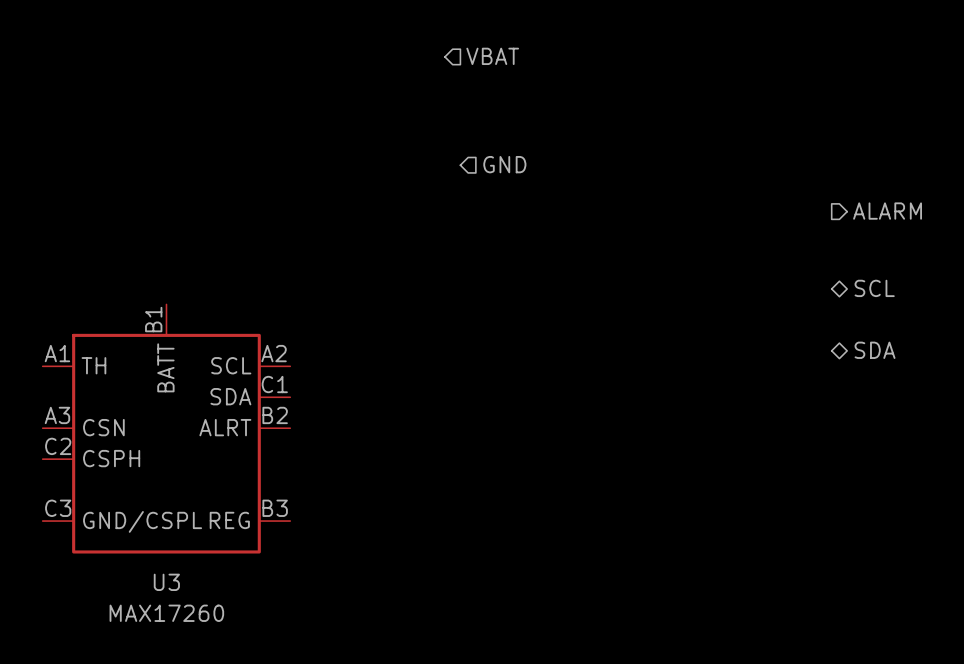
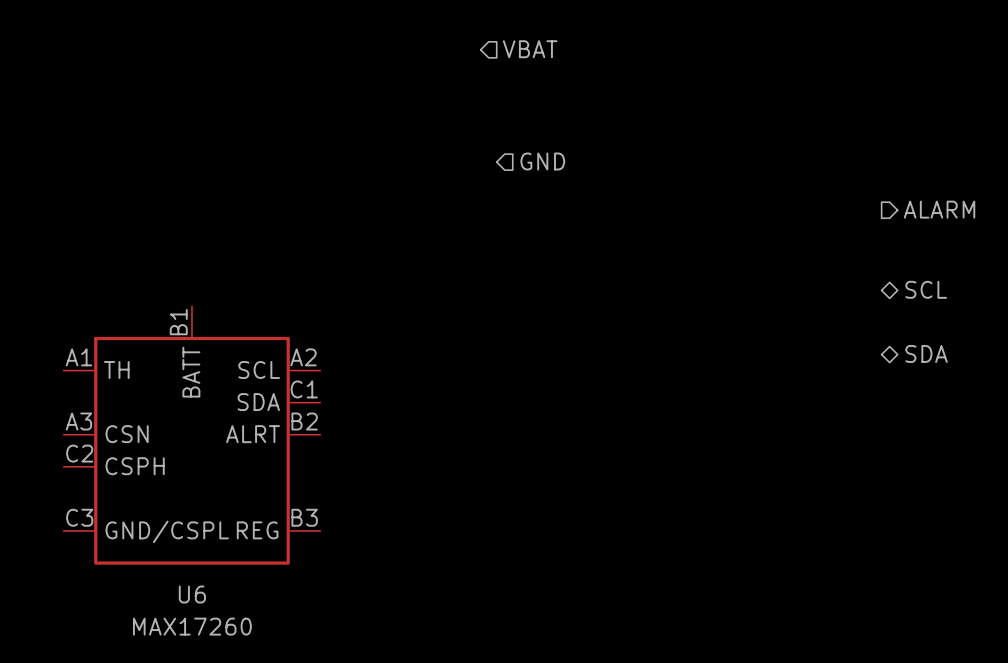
U3 name: U3 (166, 582) -> U6 (192, 594)

